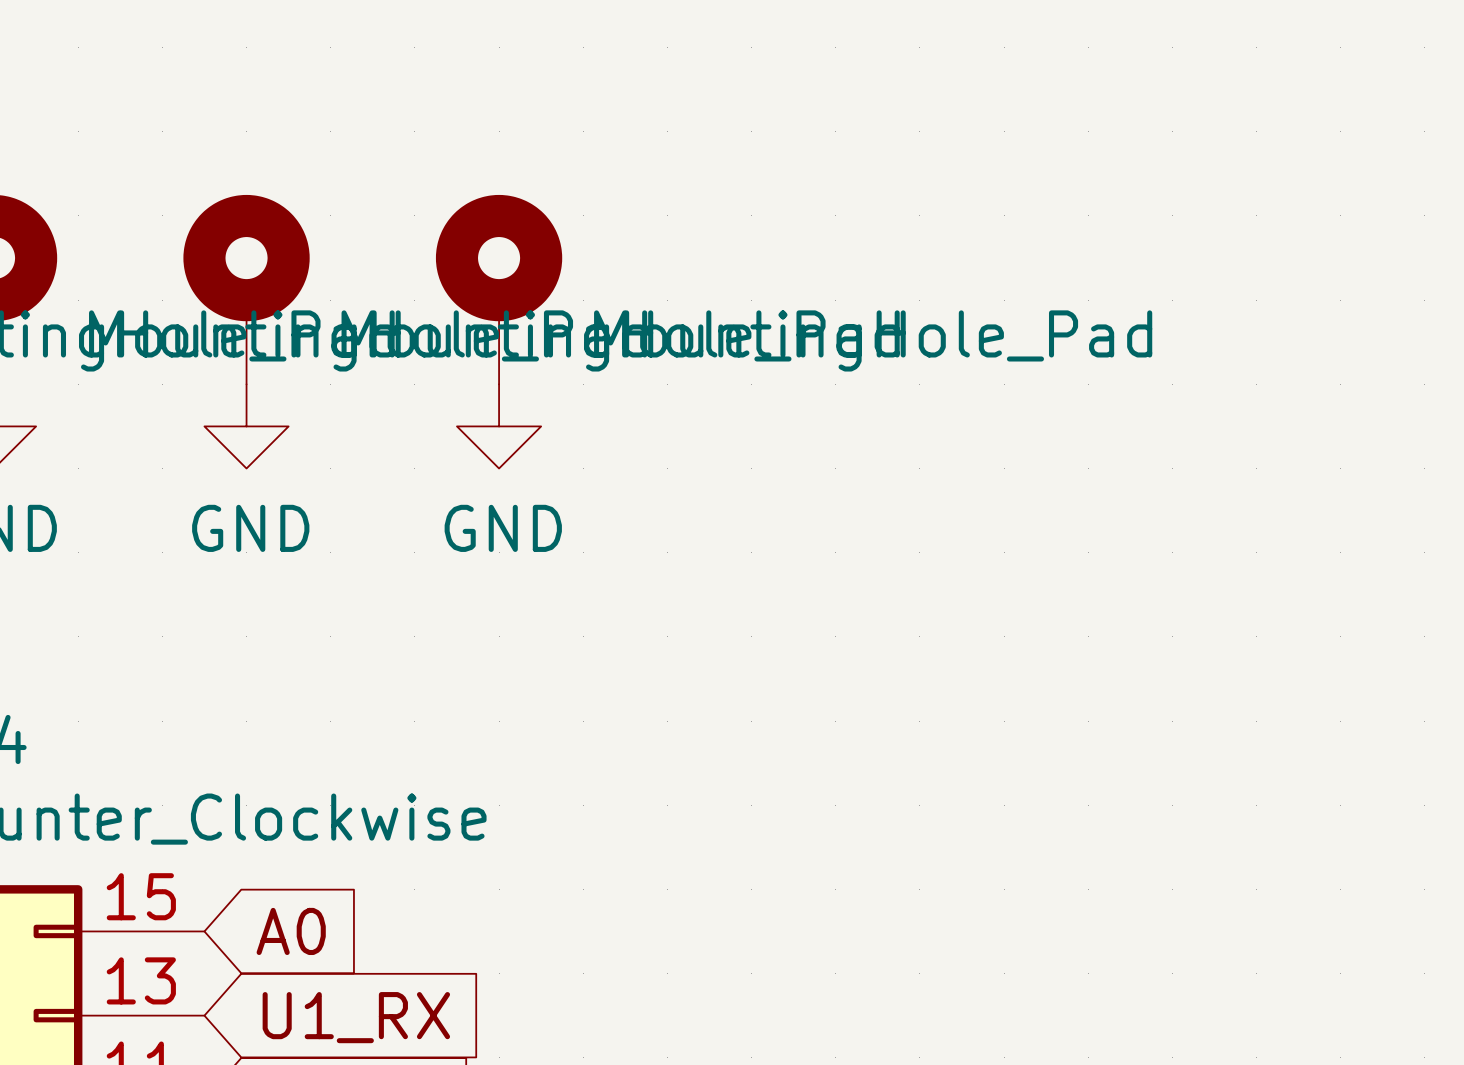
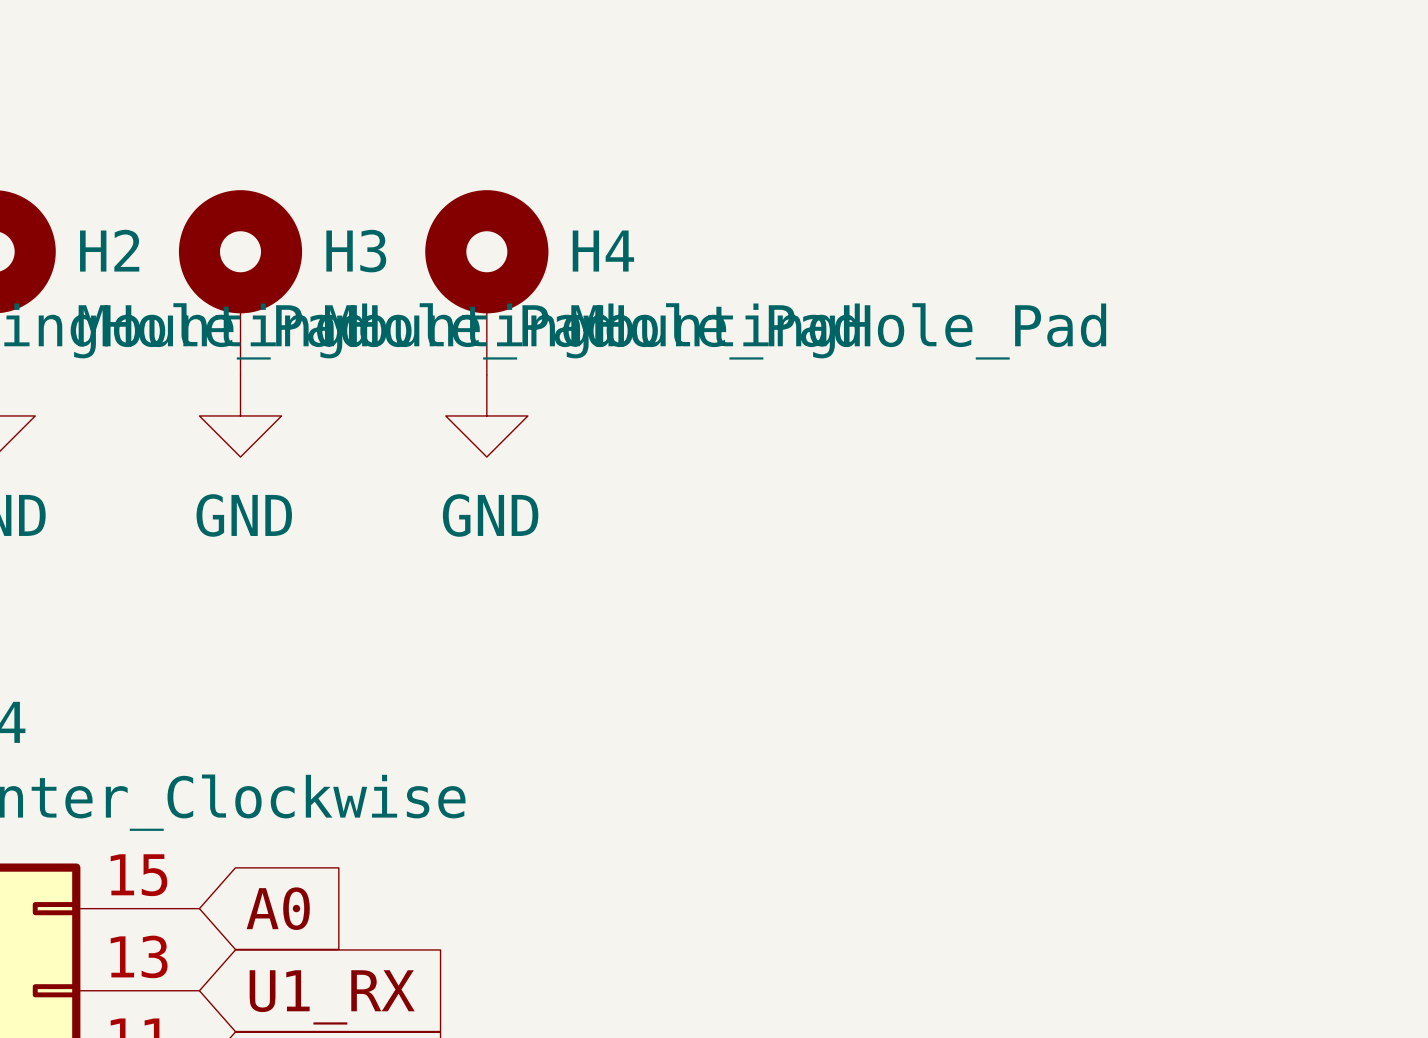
H4 name: none -> H4 (603, 251)
H2 name: none -> H2 (109, 250)
H3 name: none -> H3 (356, 251)

